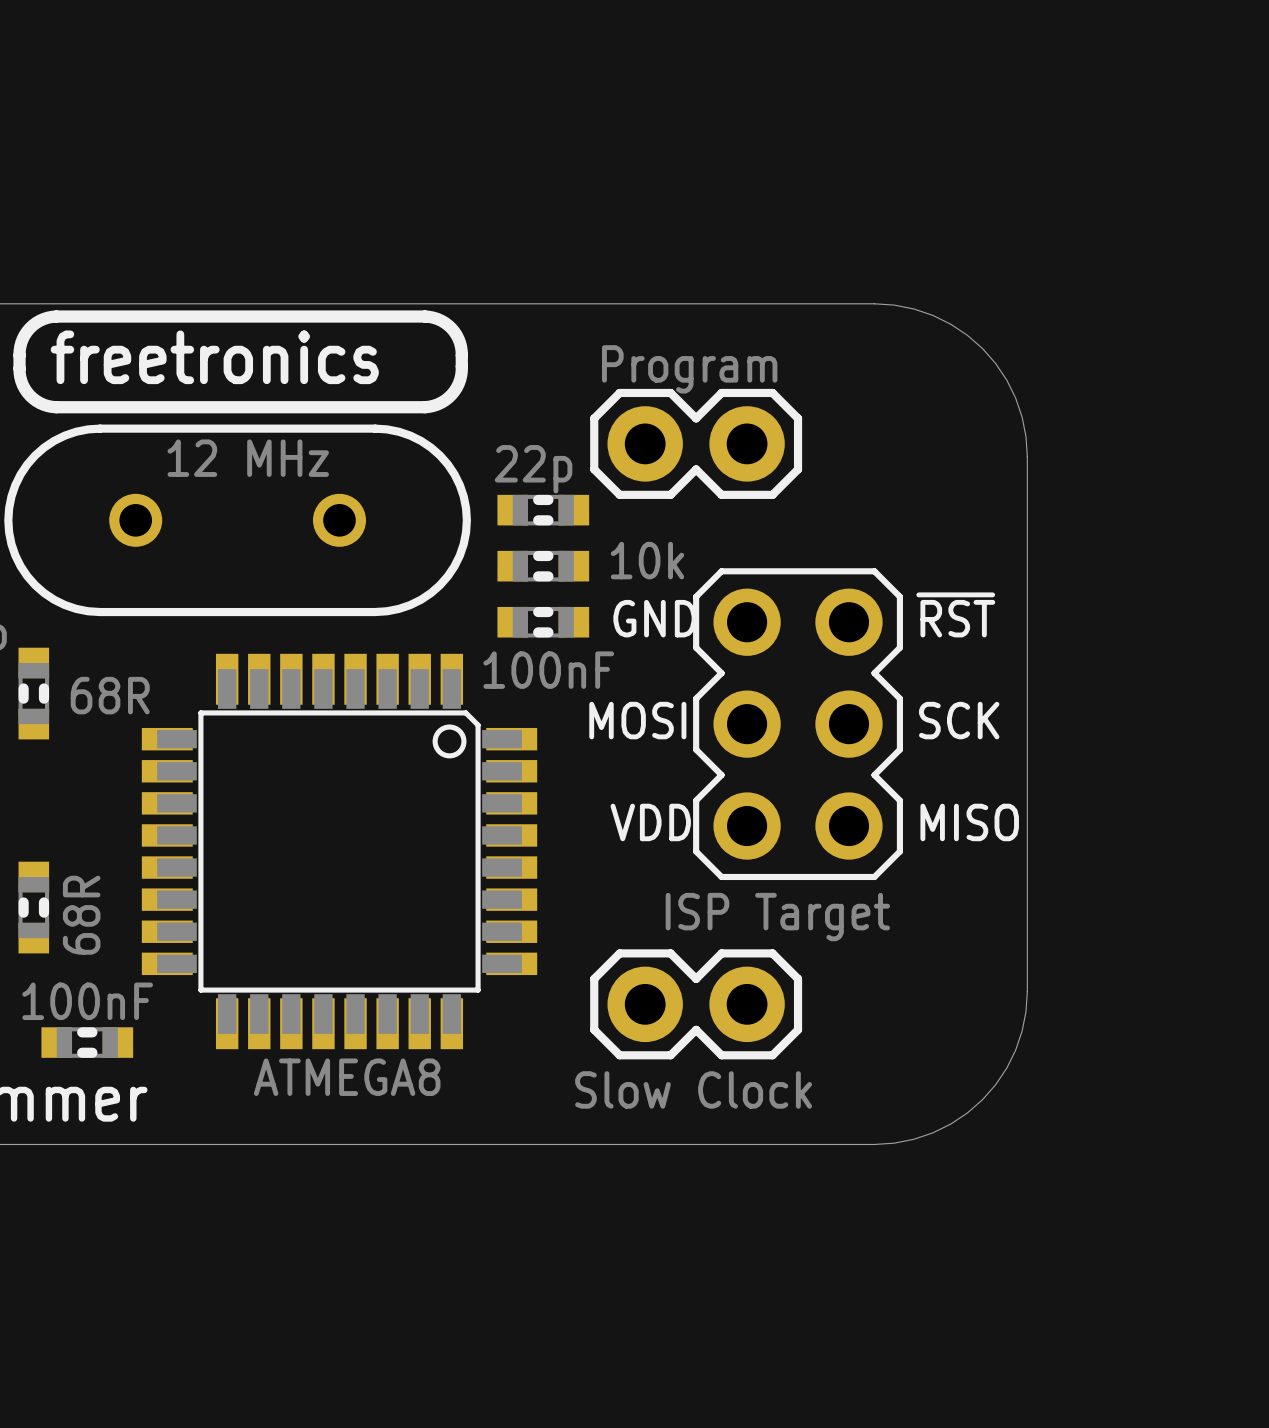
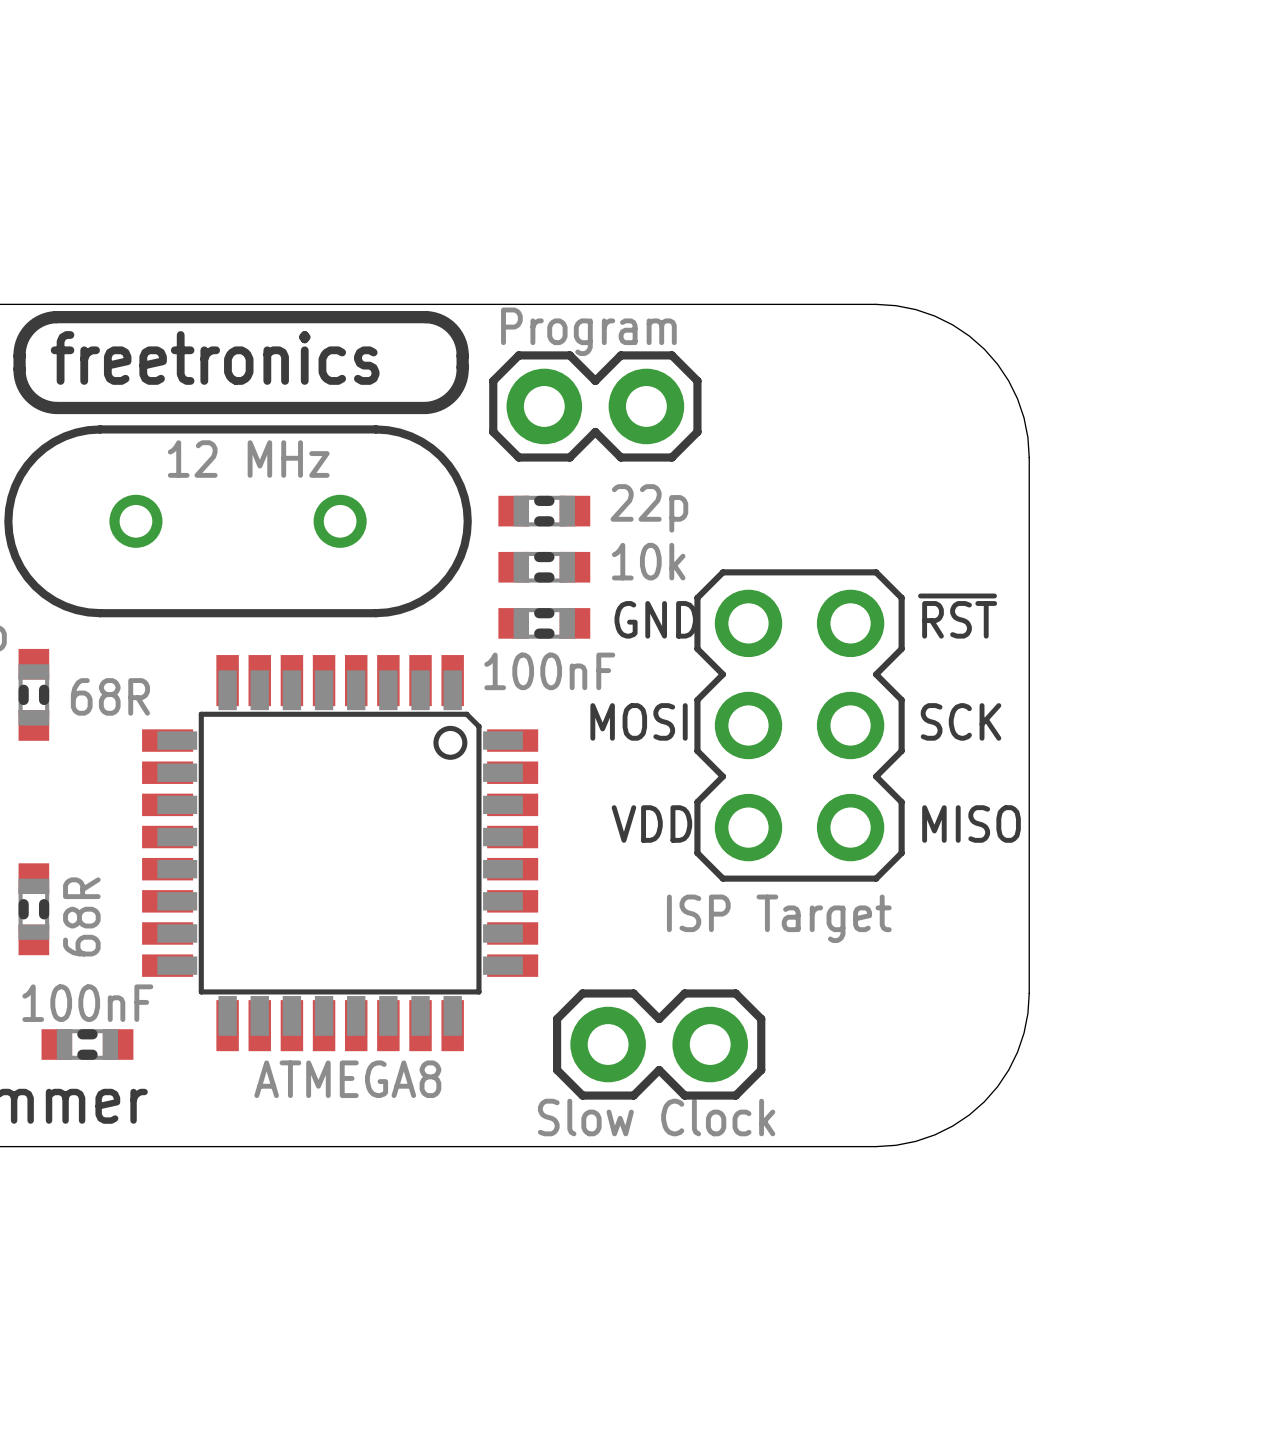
part position: (696, 443) -> (595, 406)
part value position: 22p (533, 469) -> 22p (649, 508)
part position: (696, 1004) -> (659, 1044)
part value position: Slow Clock (693, 1089) -> Slow Clock (656, 1117)

